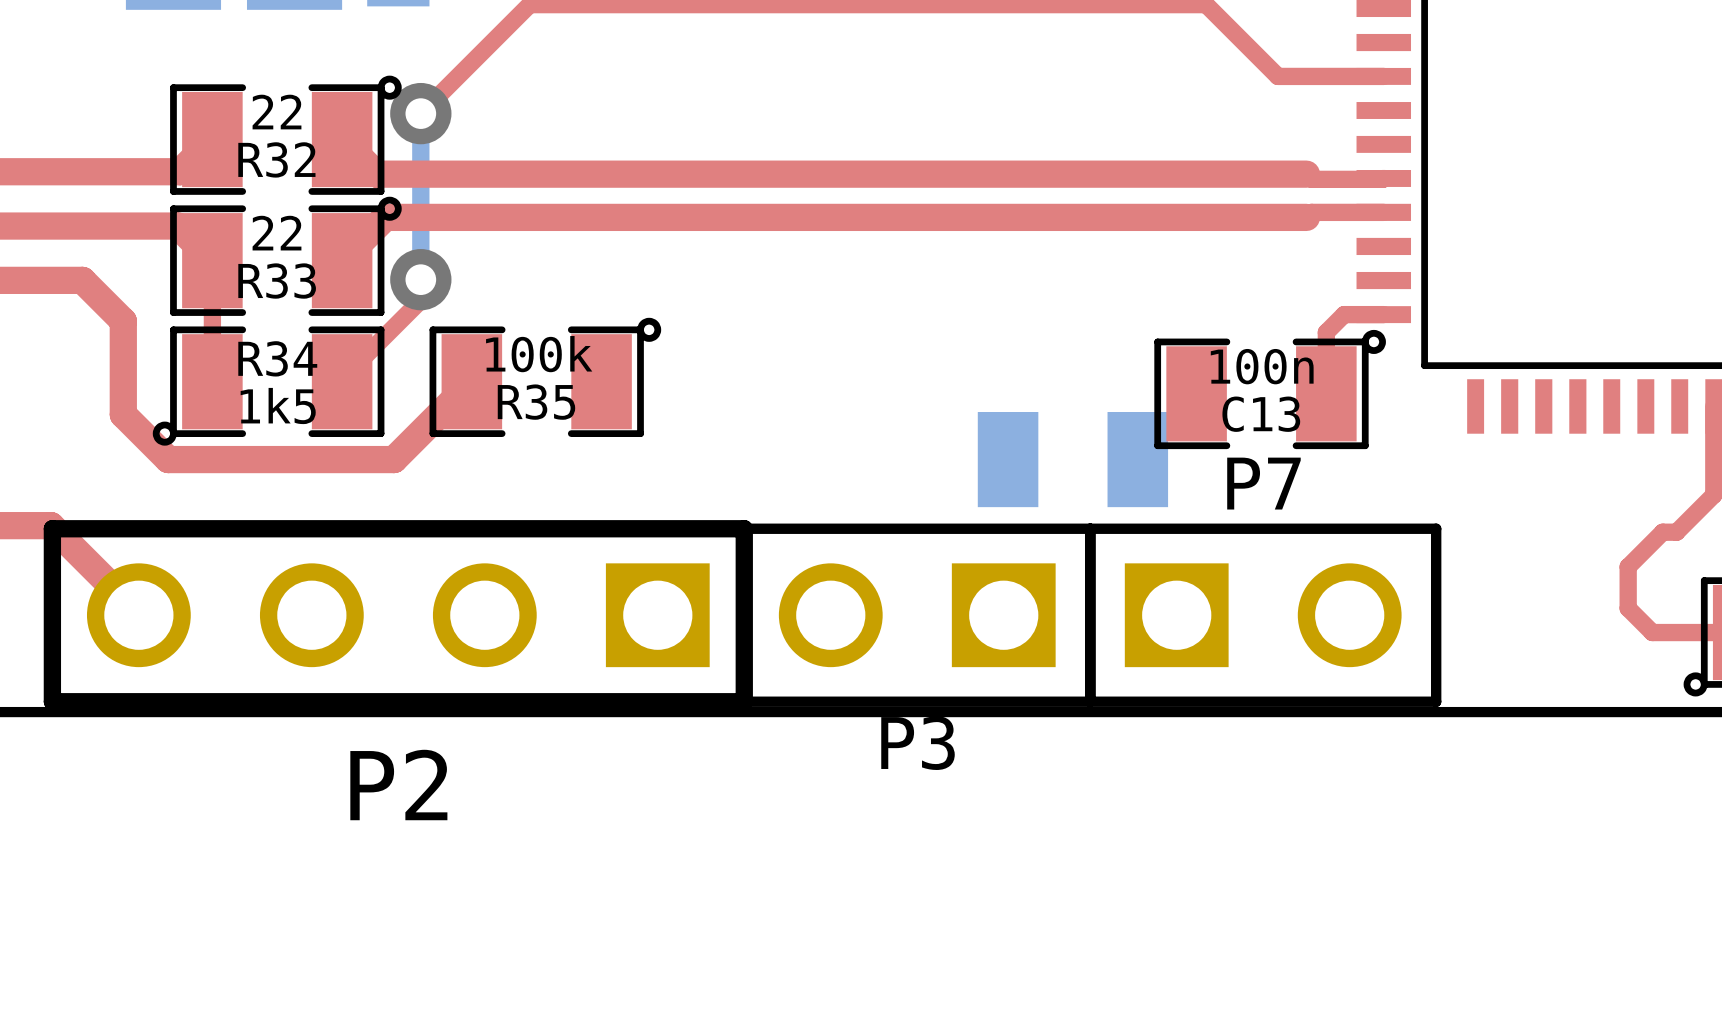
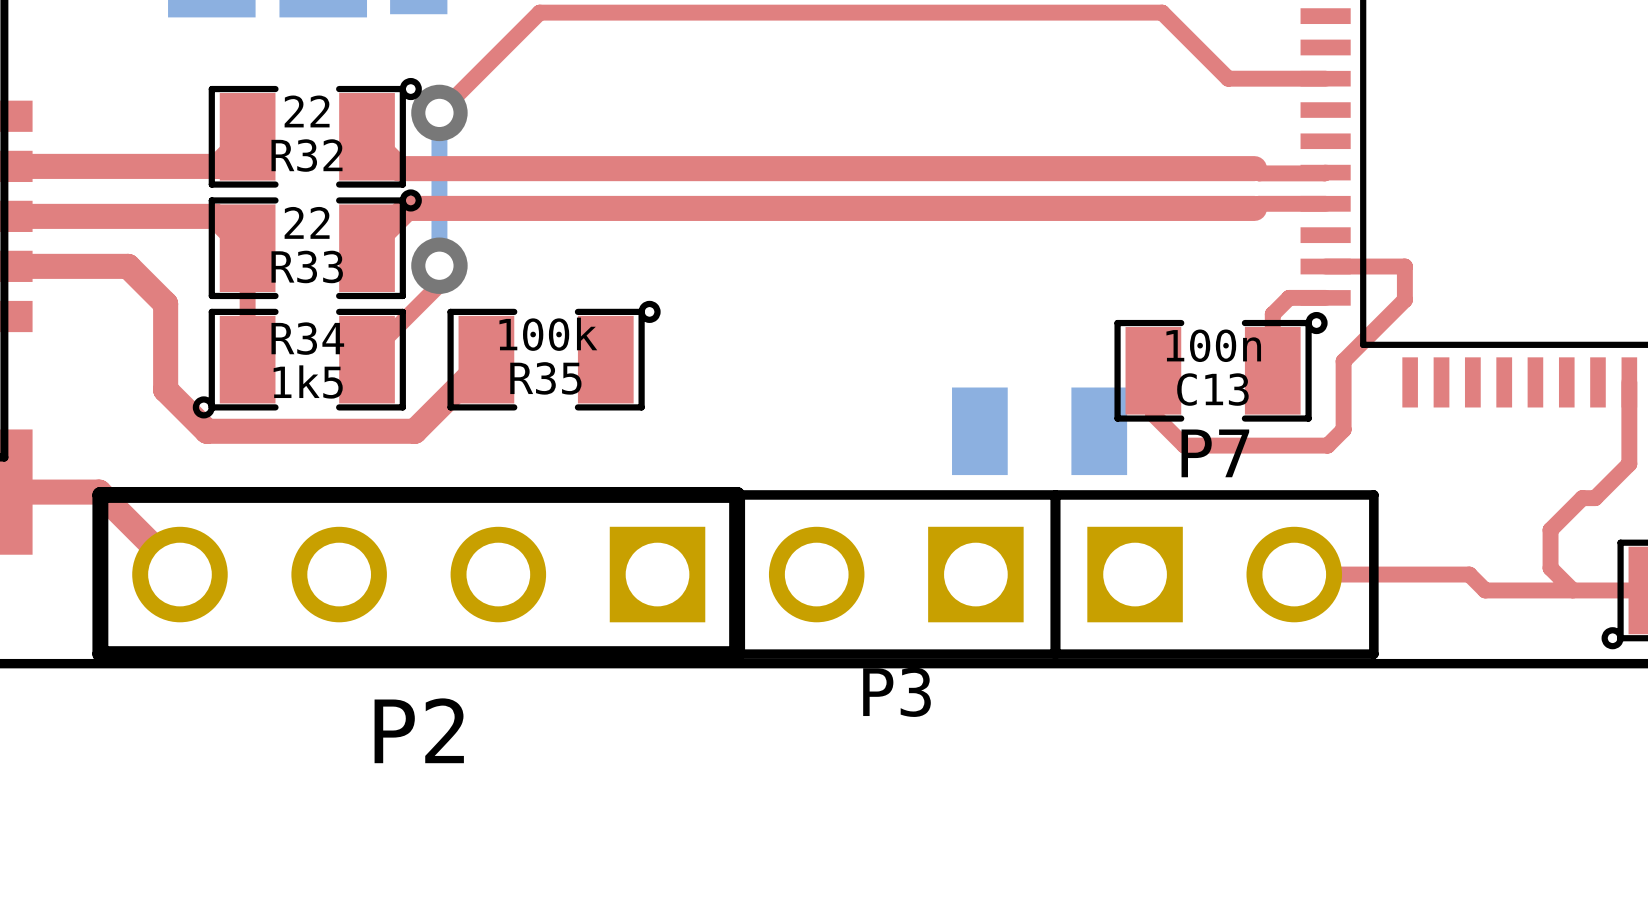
top track: none -> (1325, 266) (1404, 266) (1404, 299) (1343, 361) (1343, 429) (1327, 445) (1184, 445) (1153, 414) (1153, 370)
top track: none -> (1294, 574) (1469, 574) (1485, 590) (1572, 590)

